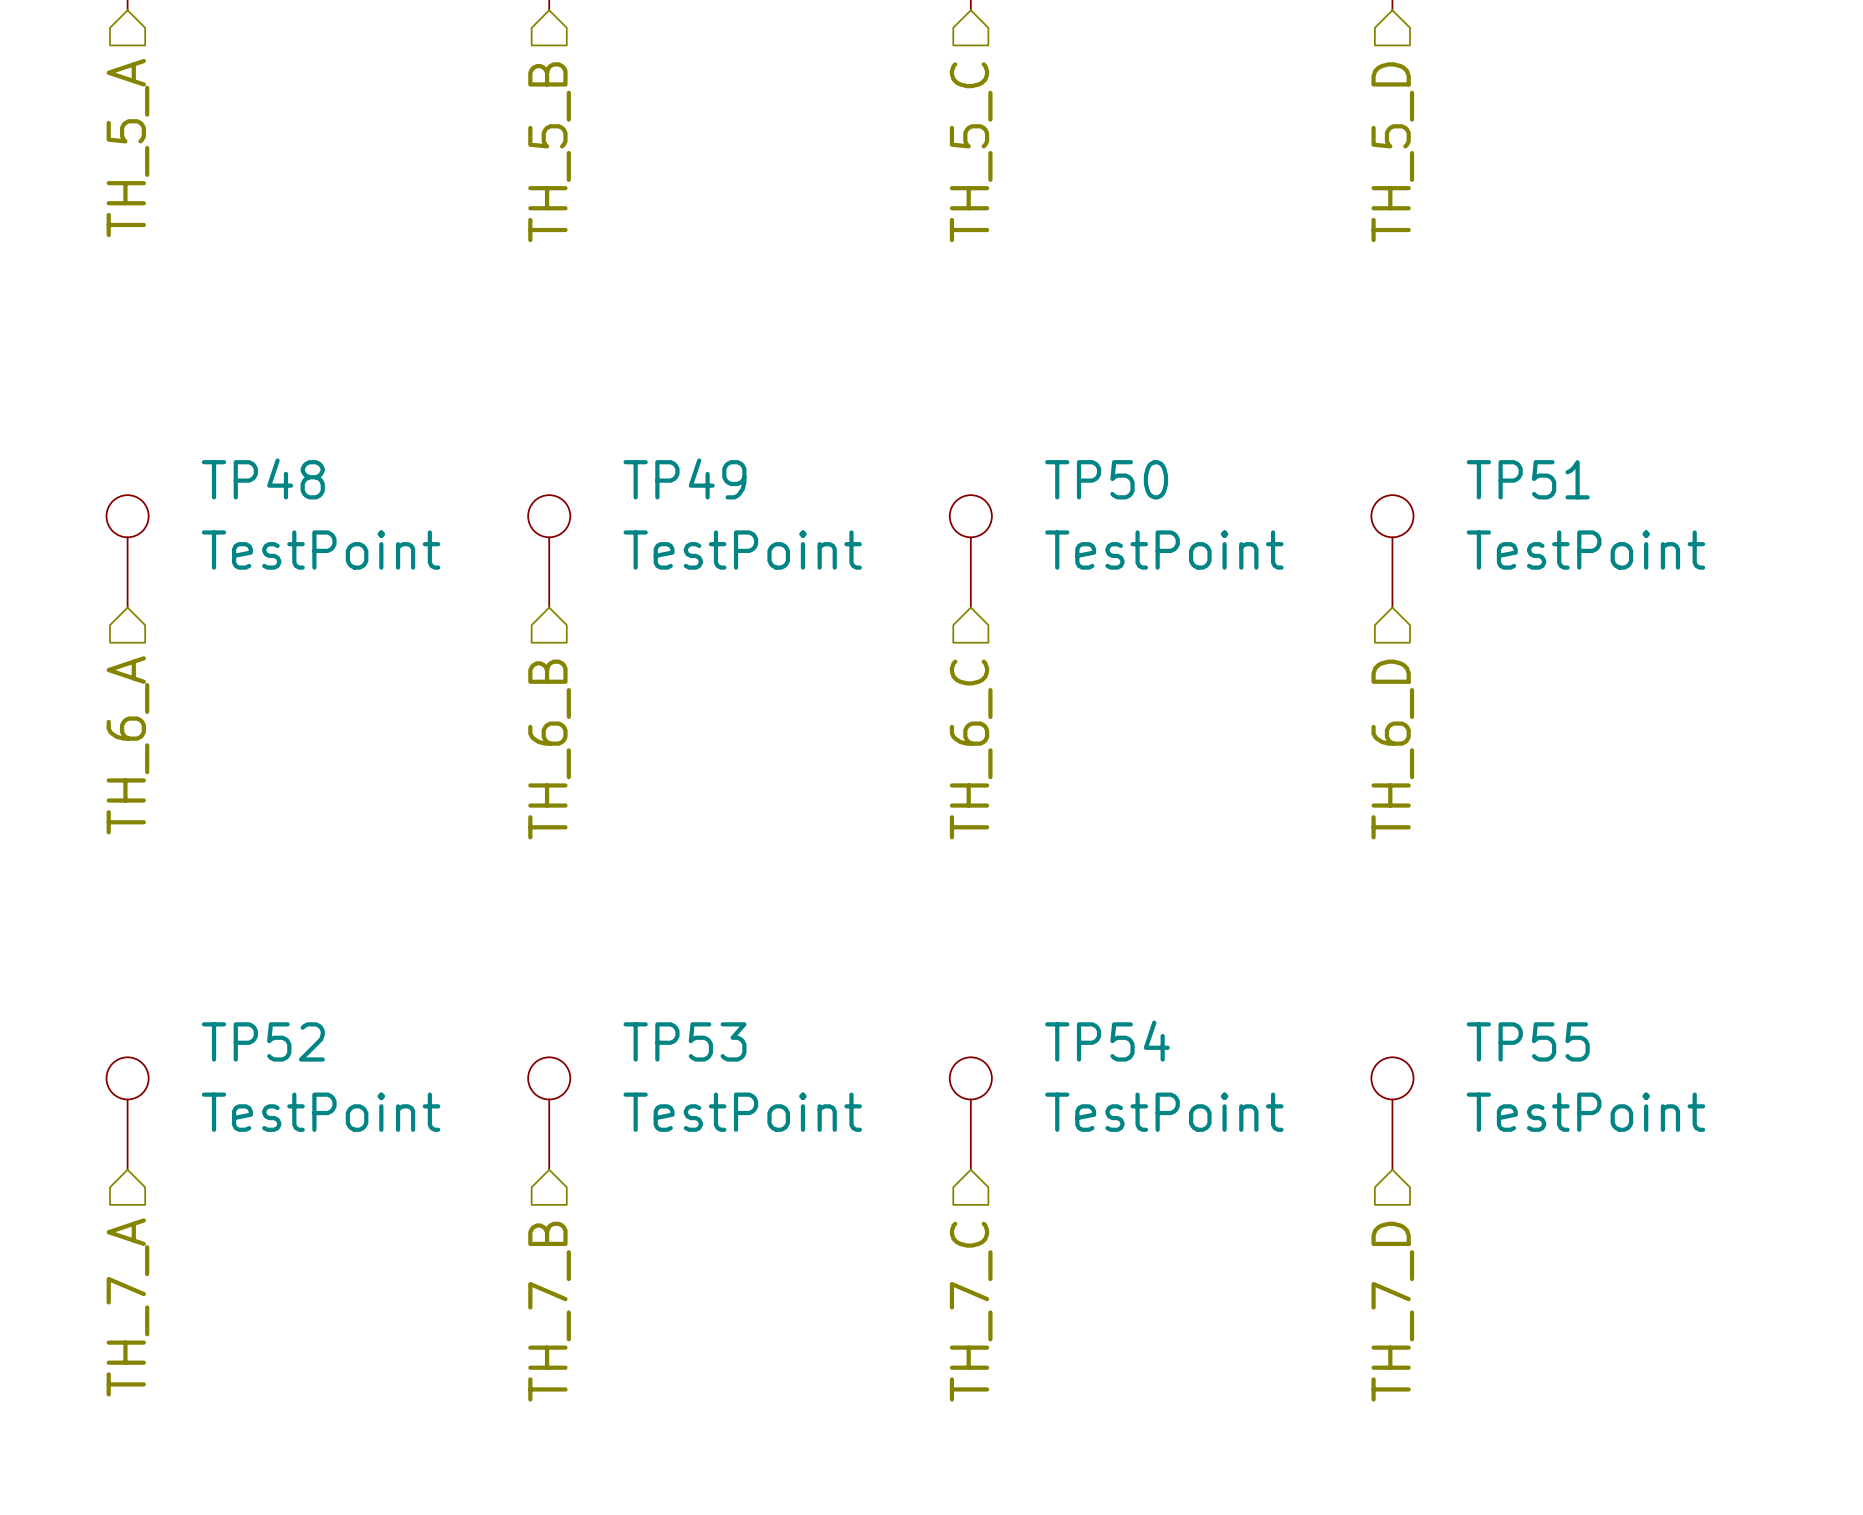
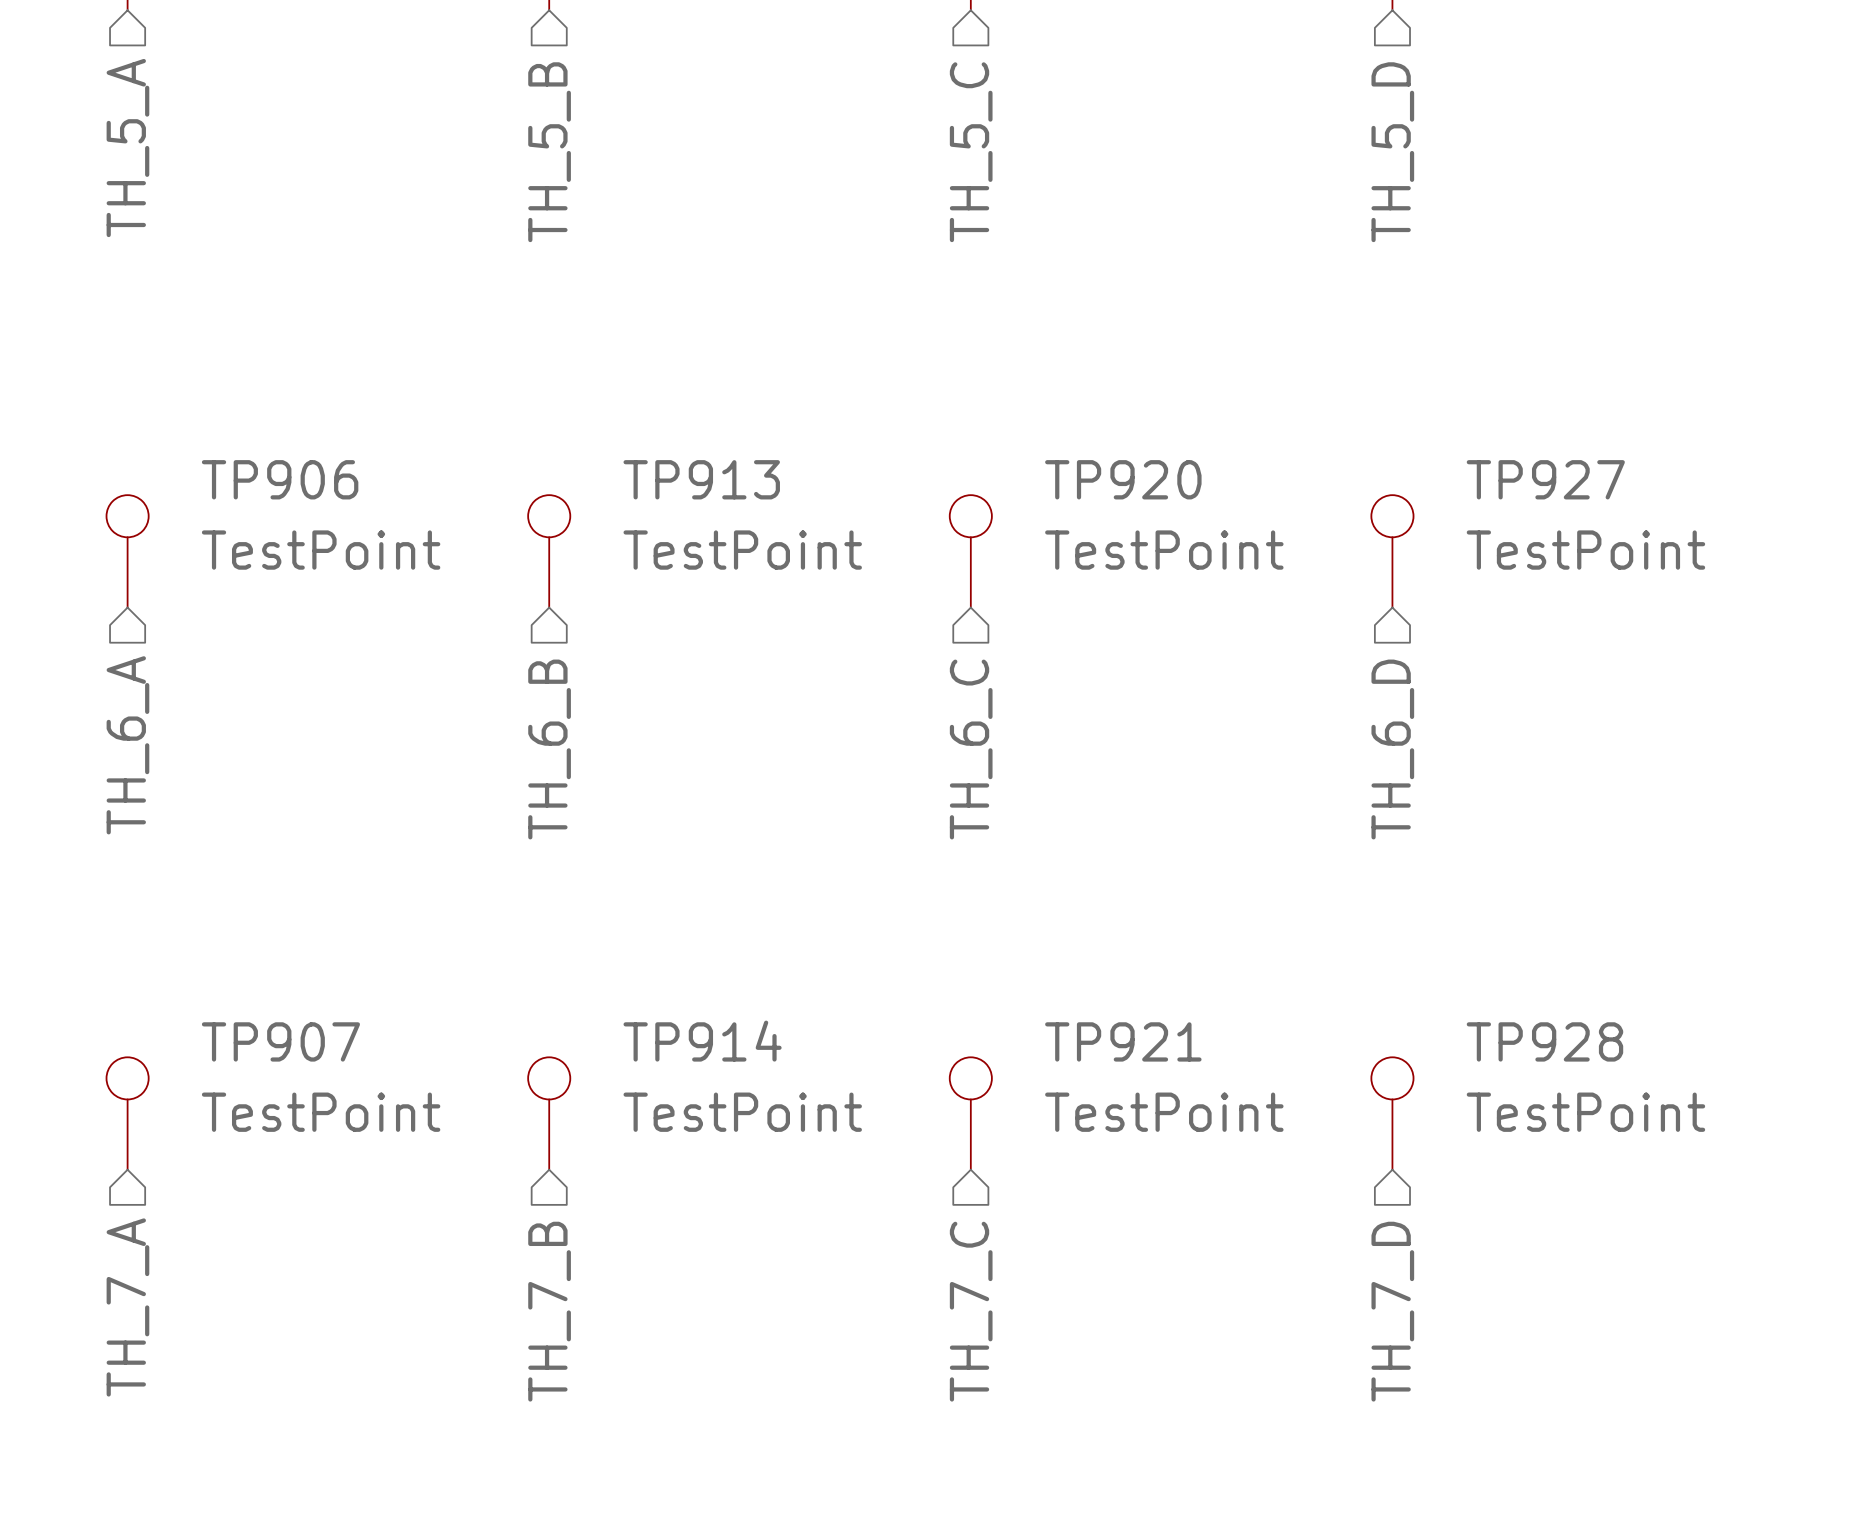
TP48 name: TP48 (263, 478) -> TP906 (280, 479)
TP49 name: TP49 (684, 478) -> TP913 (701, 479)
TP50 name: TP50 (1106, 479) -> TP920 (1123, 479)
TP51 name: TP51 (1528, 479) -> TP927 (1545, 479)
TP52 name: TP52 (263, 1041) -> TP907 (280, 1041)
TP53 name: TP53 (684, 1041) -> TP914 (702, 1041)
TP54 name: TP54 (1107, 1041) -> TP921 (1123, 1041)
TP55 name: TP55 (1528, 1041) -> TP928 (1544, 1041)

